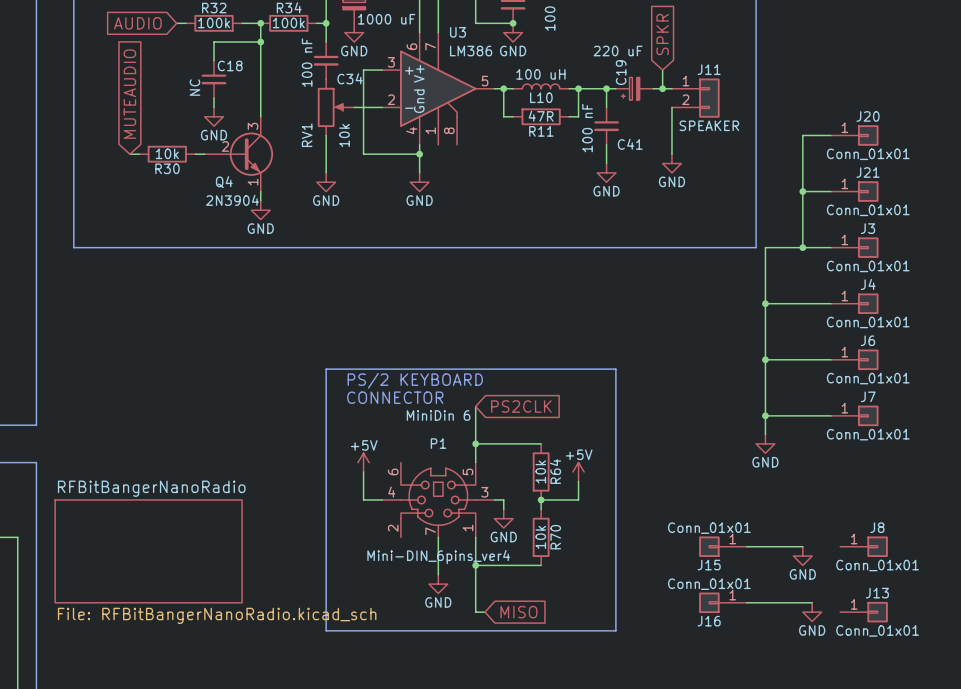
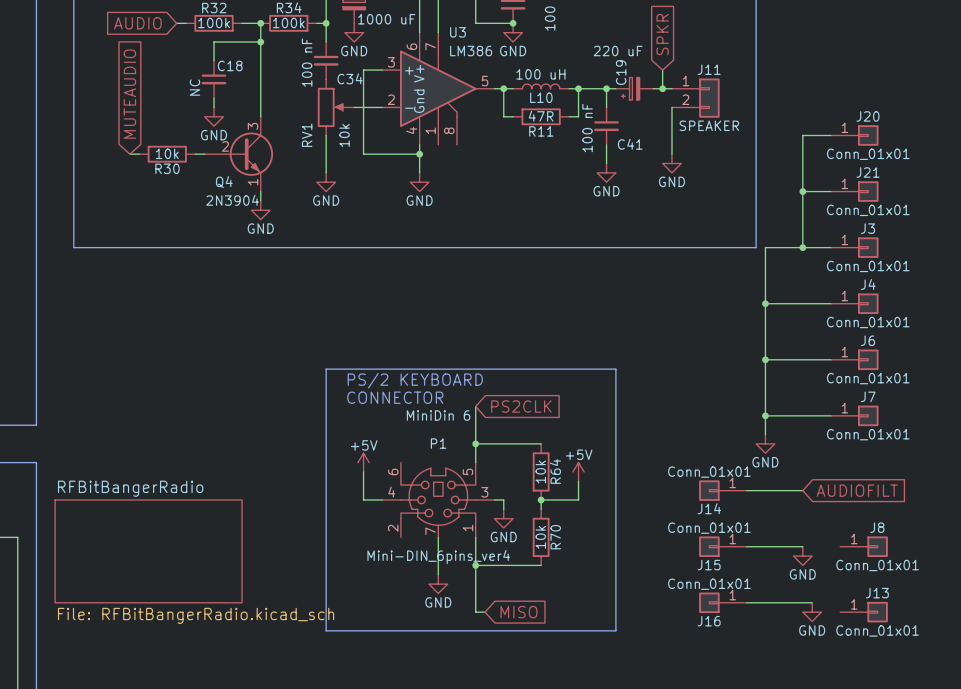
sheet RFBitBangerNanoRadio name: RFBitBangerNanoRadio (151, 488) -> RFBitBangerRadio (130, 488)
J14: none -> Conn_01x01 (722, 490)
wire: none -> (746, 490) (802, 490)
global label: none -> AUDIOFILT (857, 490)
sheet RFBitBangerNanoRadio value: File: RFBitBangerNanoRadio.kicad_sch (217, 615) -> File: RFBitBangerRadio.kicad_sch (196, 615)

